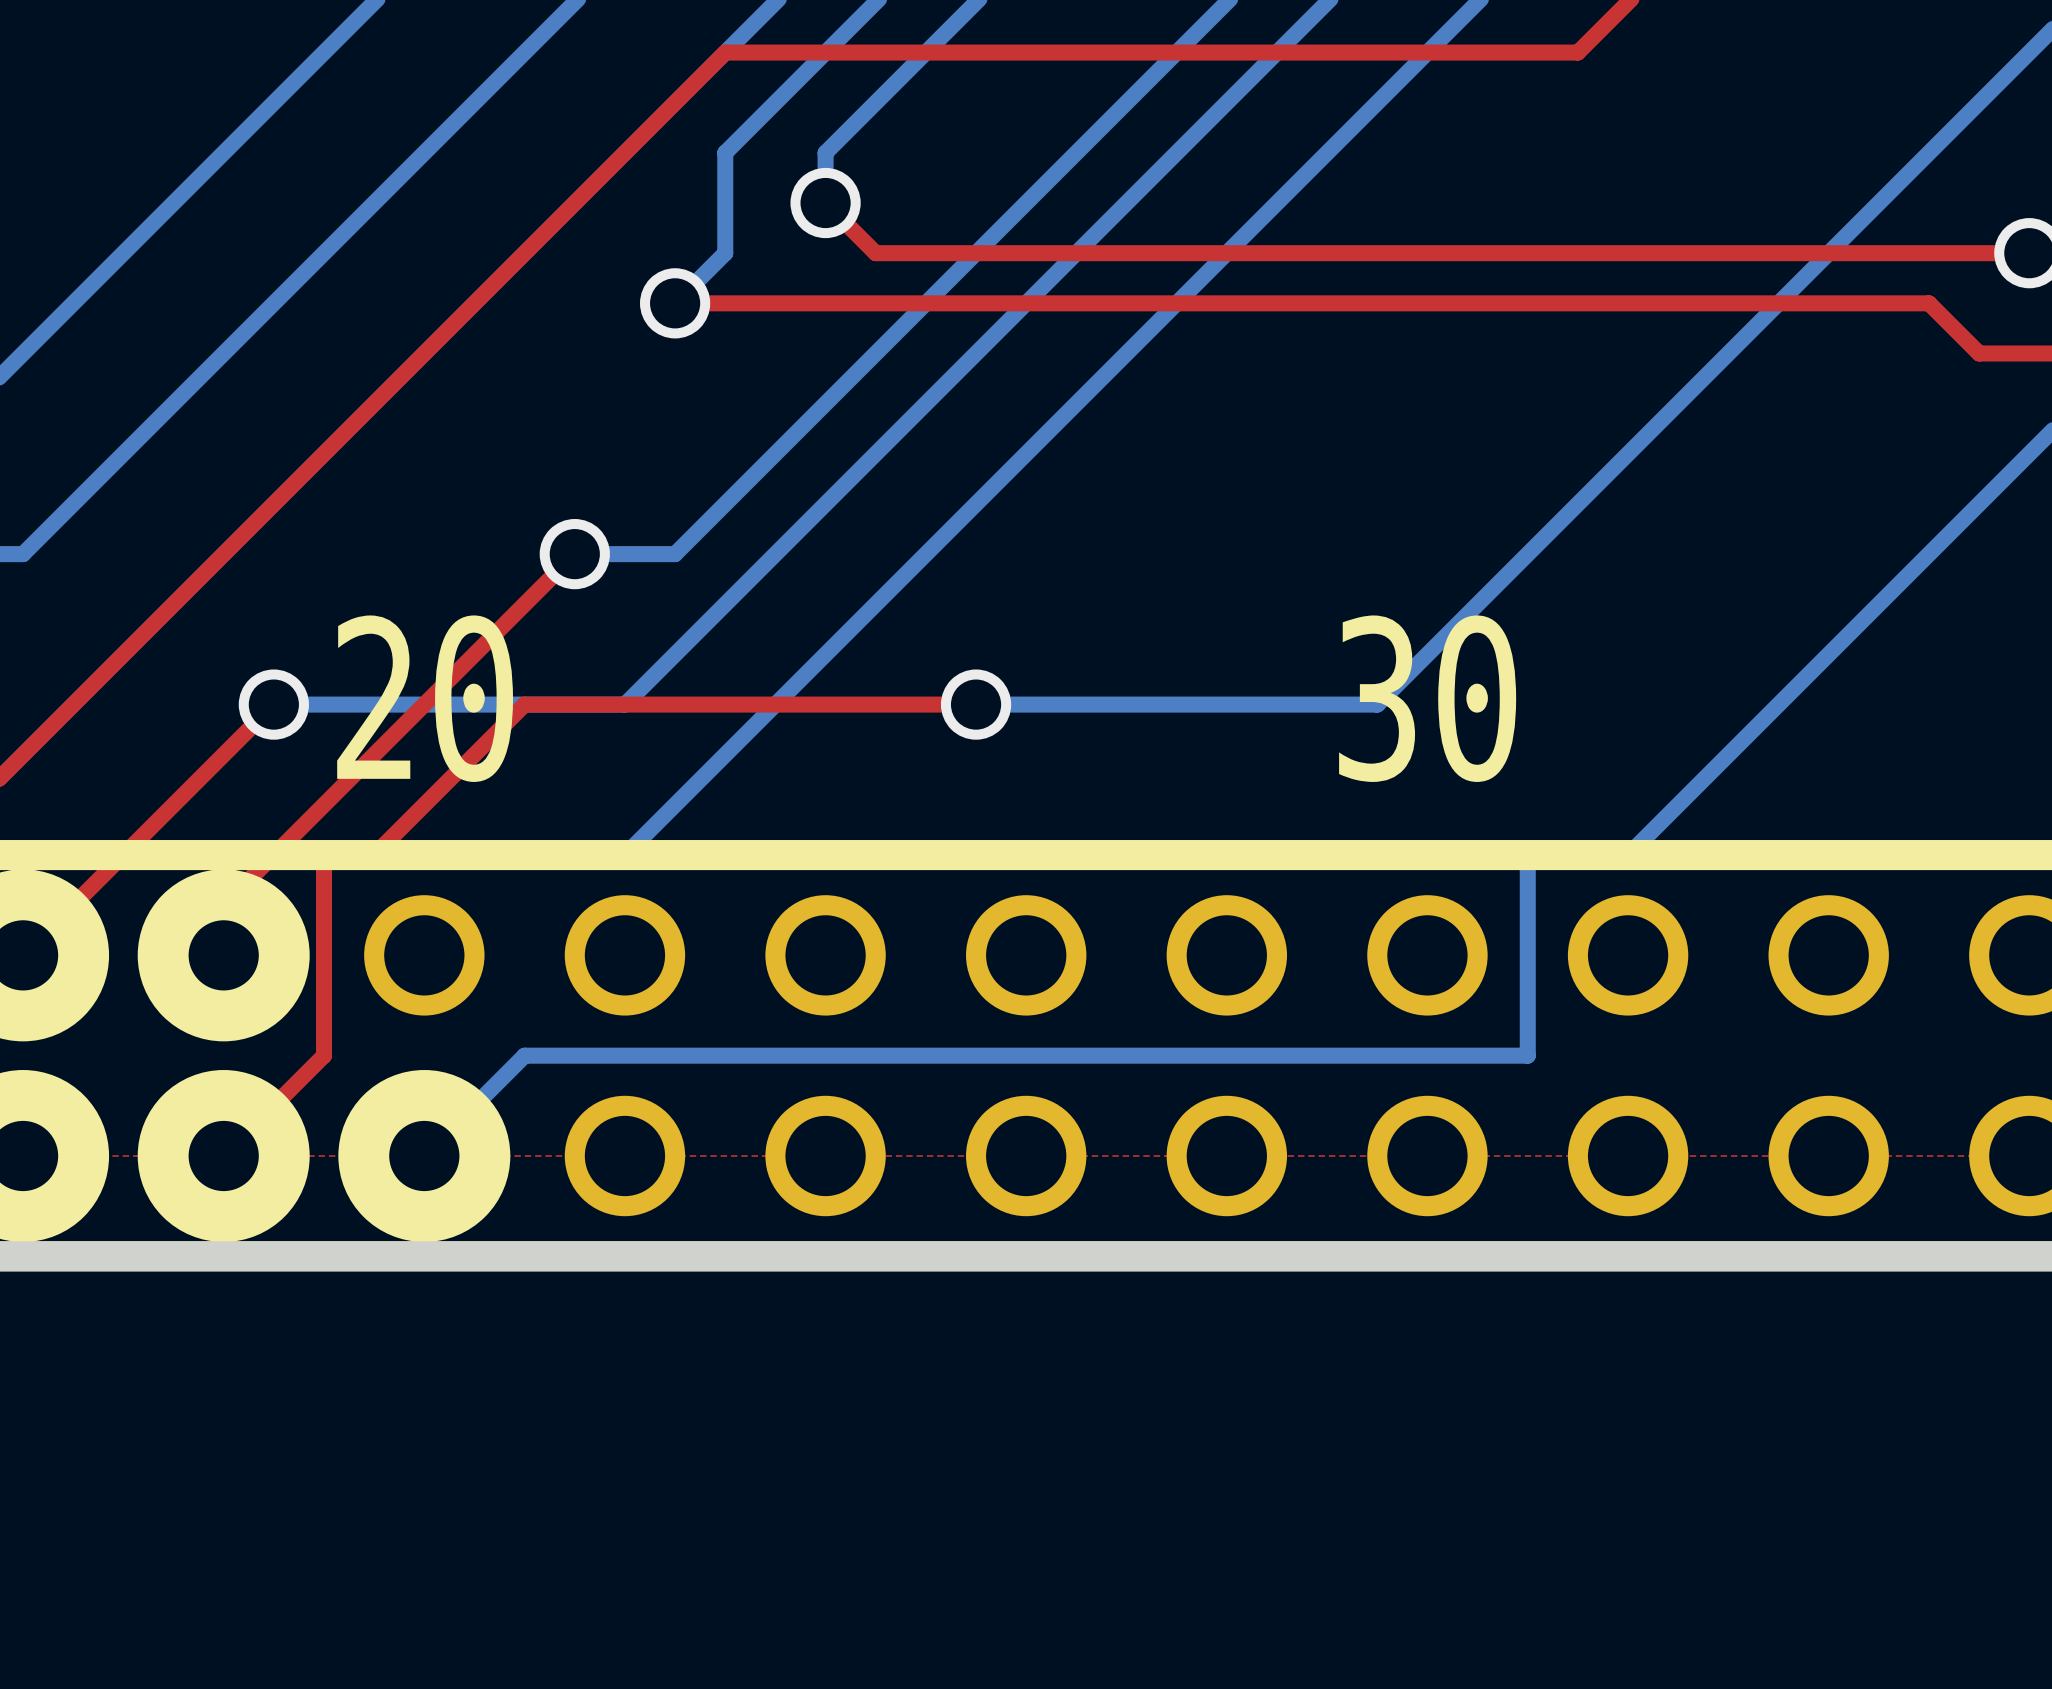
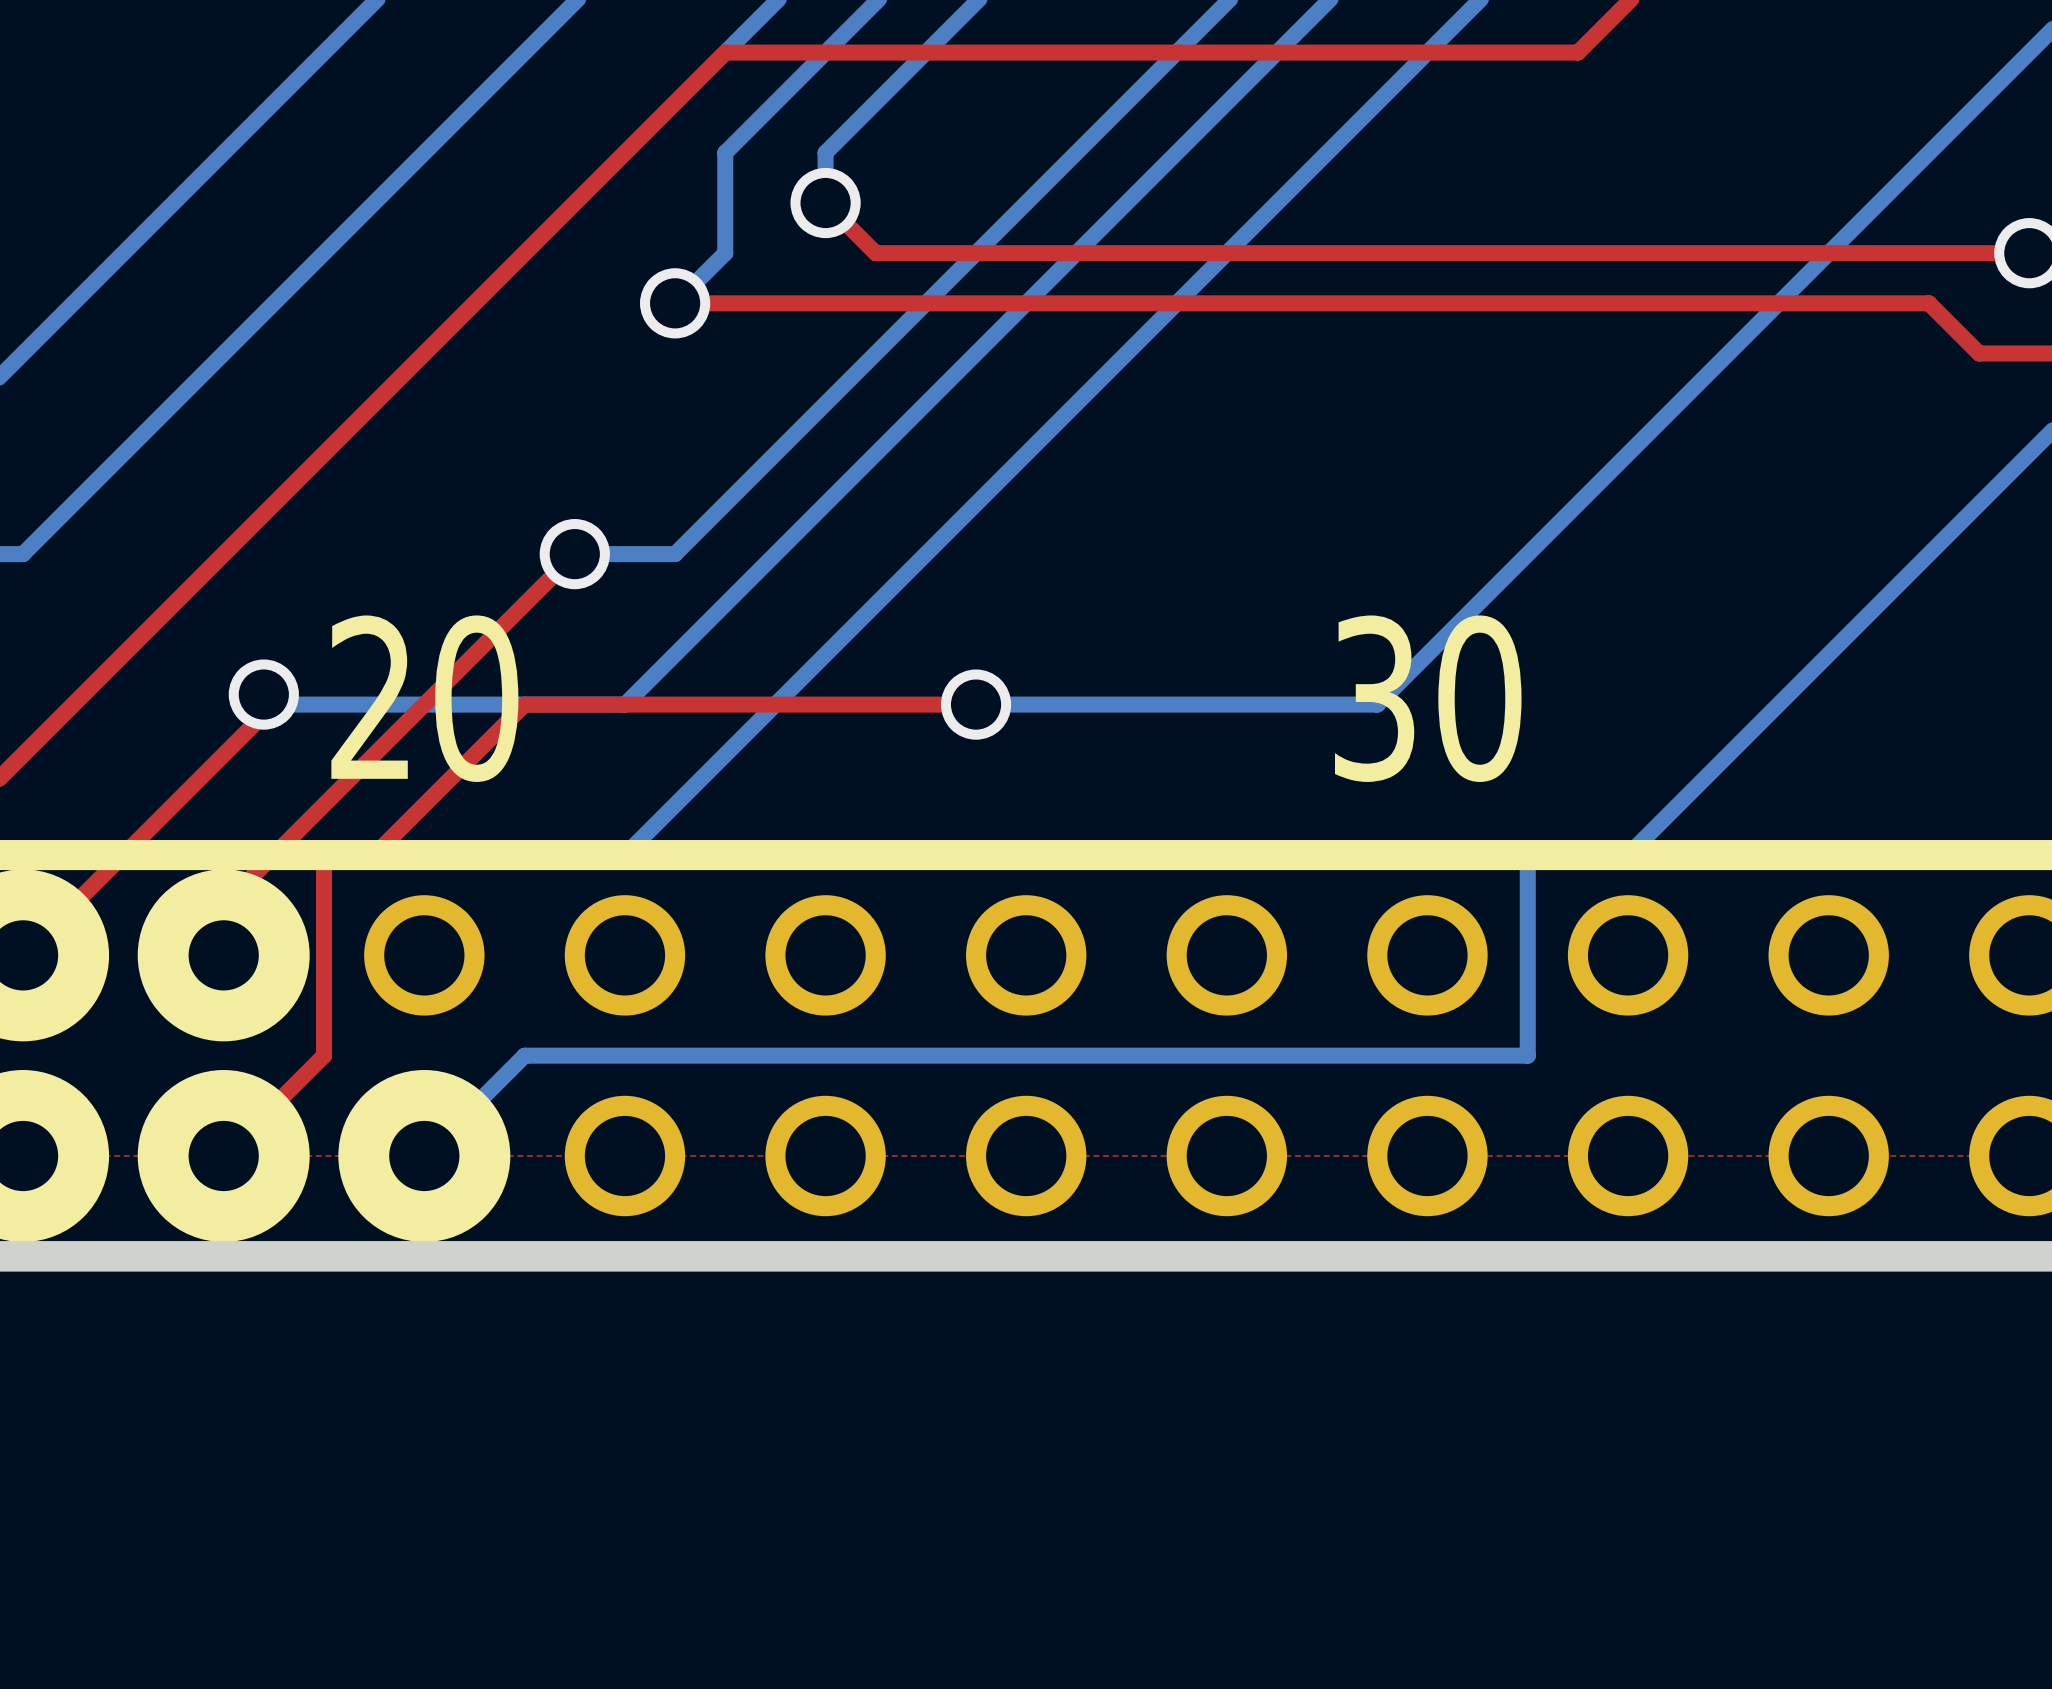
via position: (273, 704) -> (263, 694)

